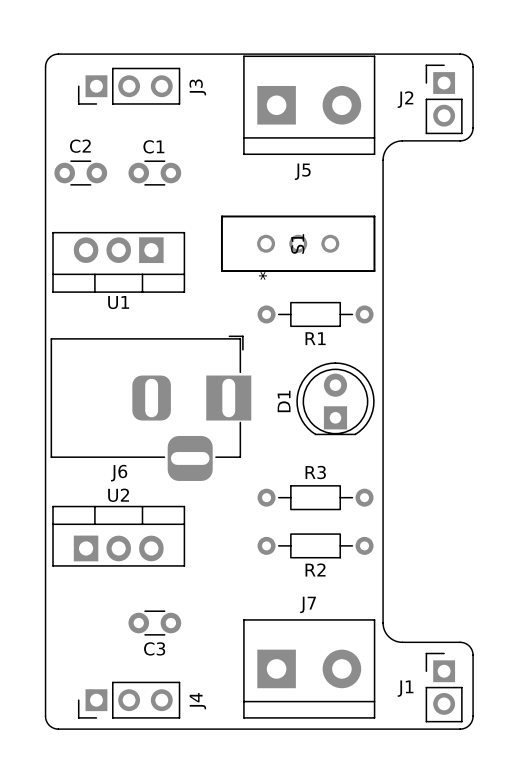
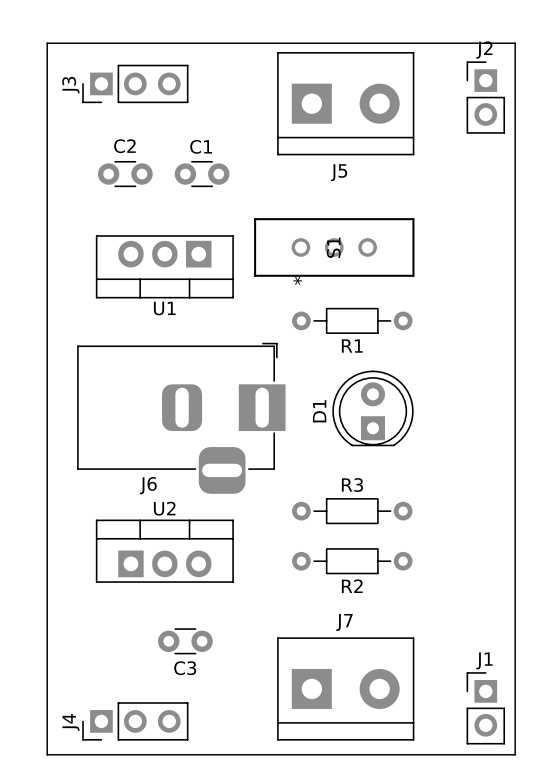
board edge: (58, 54) (460, 54) (465, 55) (471, 60) (473, 66) (473, 128) (470, 136) (461, 140) (397, 141) (387, 148) (383, 160) (383, 625) (388, 636) (397, 641) (461, 642) (470, 647) (473, 655) (473, 716) (471, 721) (467, 727) (460, 729) (58, 729) (52, 727) (47, 723) (45, 716) (45, 66) (49, 57) (58, 54) -> (47, 43) (47, 754) (515, 754) (515, 43) (47, 43)
J3 position: (129, 86) -> (135, 83)
J3 name position: J3 (197, 87) -> J3 (70, 85)
J2 name position: J2 (405, 99) -> J2 (484, 50)
C2 position: (80, 173) -> (125, 174)
C1 position: (154, 173) -> (202, 174)
U1 position: (118, 262) -> (164, 266)
U2 position: (118, 536) -> (164, 551)
J1 name position: J1 (405, 688) -> J1 (484, 660)
J4 position: (129, 700) -> (135, 721)
J4 name position: J4 (197, 701) -> J4 (70, 722)

